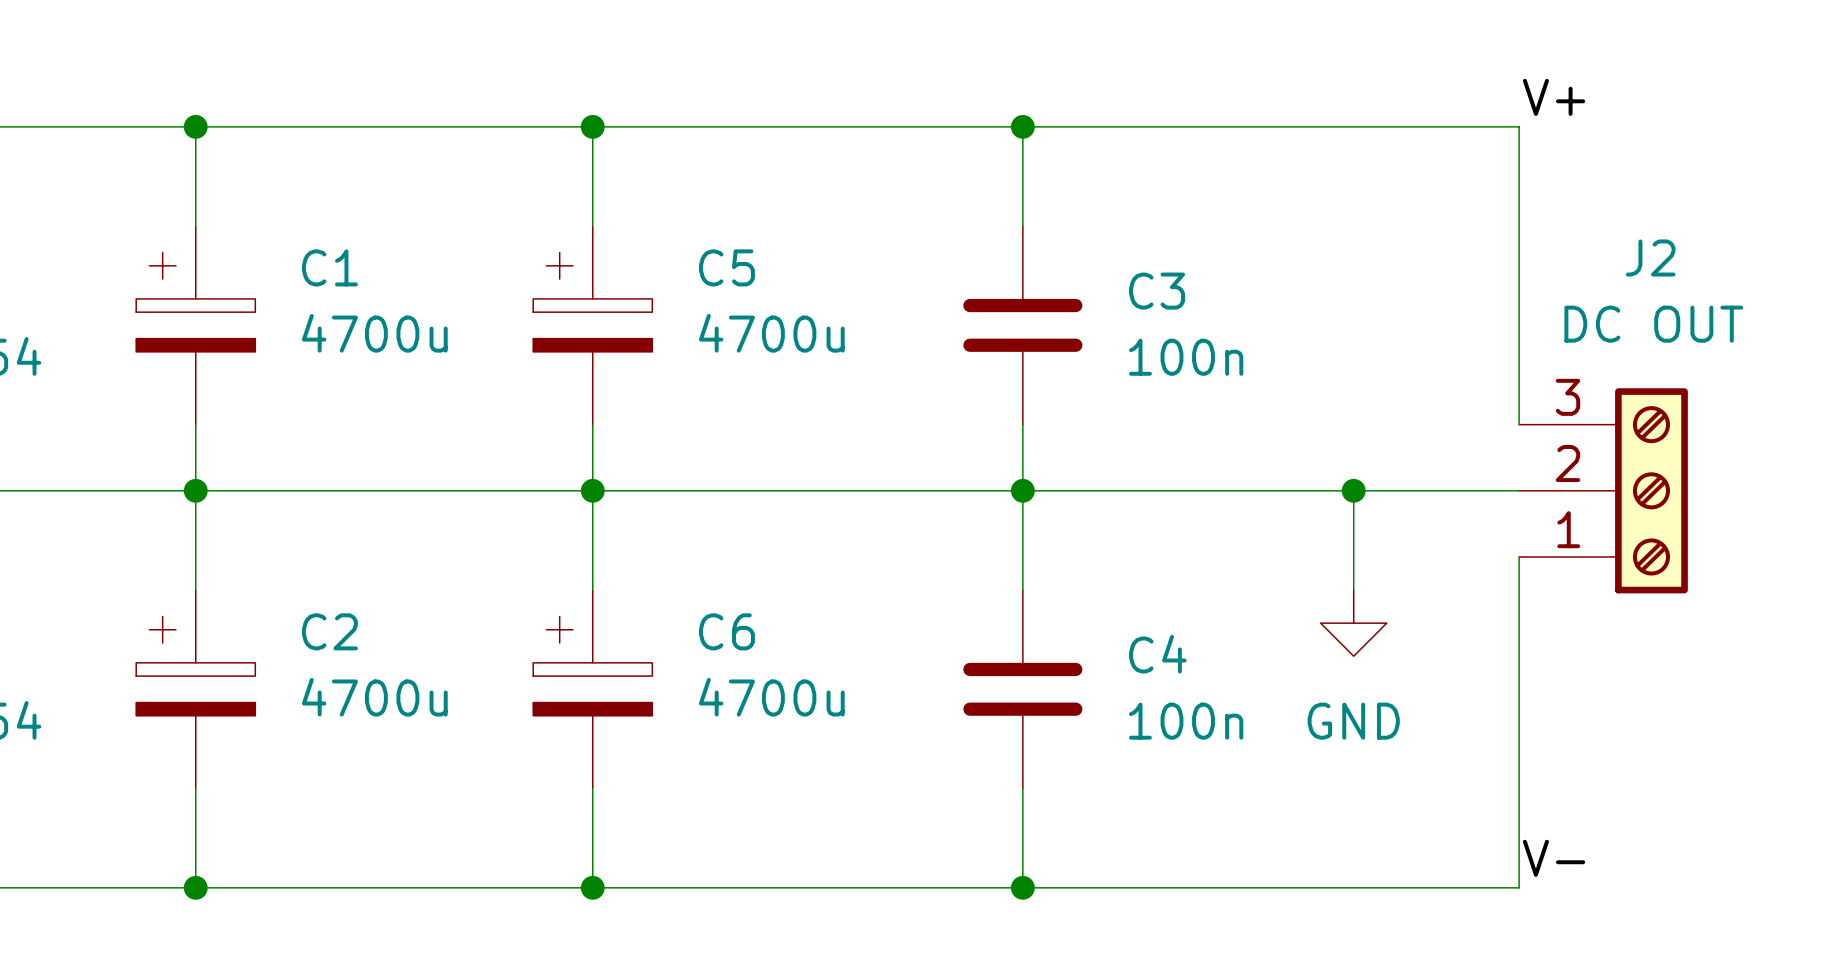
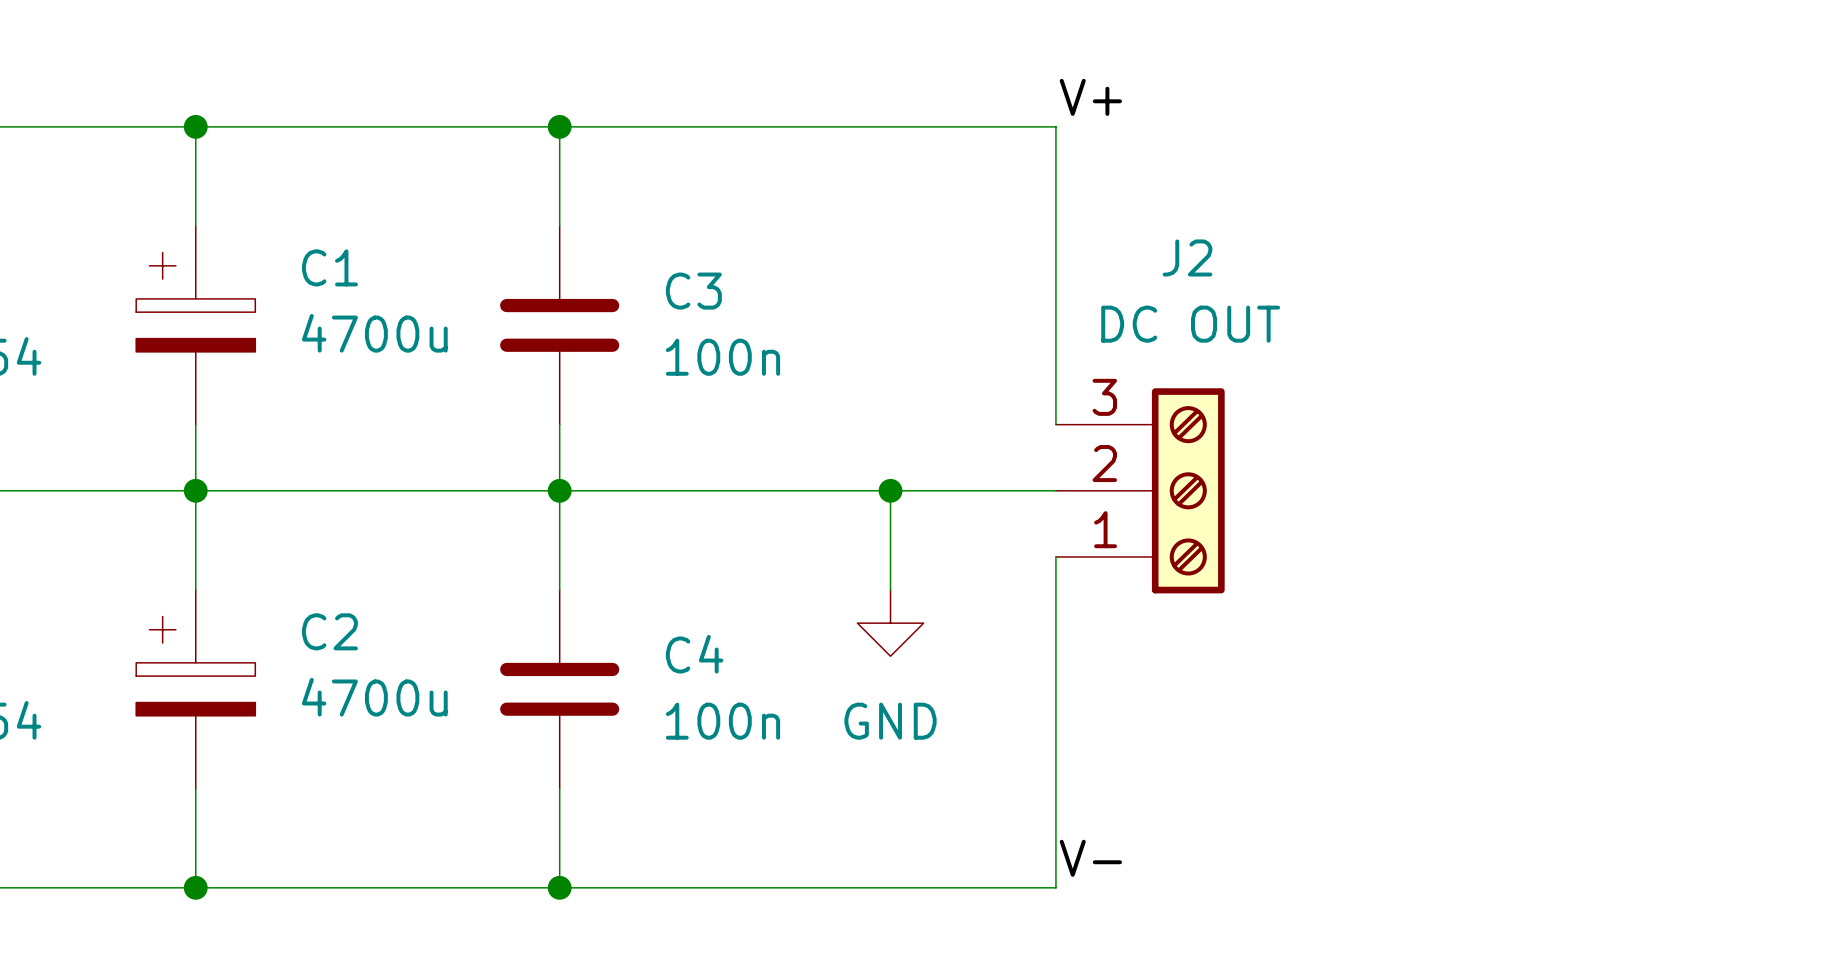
label position: V+ (1554, 97) -> V+ (1090, 97)
wire: (592, 126) (592, 226) -> none
junction position: (592, 126) -> (559, 126)
wire: (1022, 126) (1022, 226) -> (559, 126) (559, 226)
junction: (1022, 126) -> none
wire: (1055, 126) (1519, 126) (1519, 424) -> (1055, 126) (1055, 424)
C5: 4700u (592, 325) -> none
C3 position: (1022, 325) -> (559, 325)
wire: (592, 424) (592, 590) -> none
wire: (1022, 424) (1022, 590) -> (559, 424) (559, 590)
junction position: (592, 490) -> (559, 490)
junction position: (1022, 490) -> (890, 490)
wire: (1055, 490) (1519, 490) -> none
wire: (1353, 490) (1353, 590) -> (890, 490) (890, 590)
junction: (1353, 490) -> none
J2 position: (1603, 490) -> (1140, 490)
wire: (1519, 556) (1519, 887) (1055, 887) -> (1055, 556) (1055, 887)
power symbol position: GND (1353, 623) -> GND (890, 623)
C6: 4700u (592, 689) -> none
C4 position: (1022, 689) -> (559, 689)
wire: (592, 788) (592, 887) -> none
wire: (1022, 788) (1022, 887) -> (559, 788) (559, 887)
label position: V- (1554, 858) -> V- (1090, 858)
junction position: (592, 887) -> (559, 887)
junction: (1022, 887) -> none

